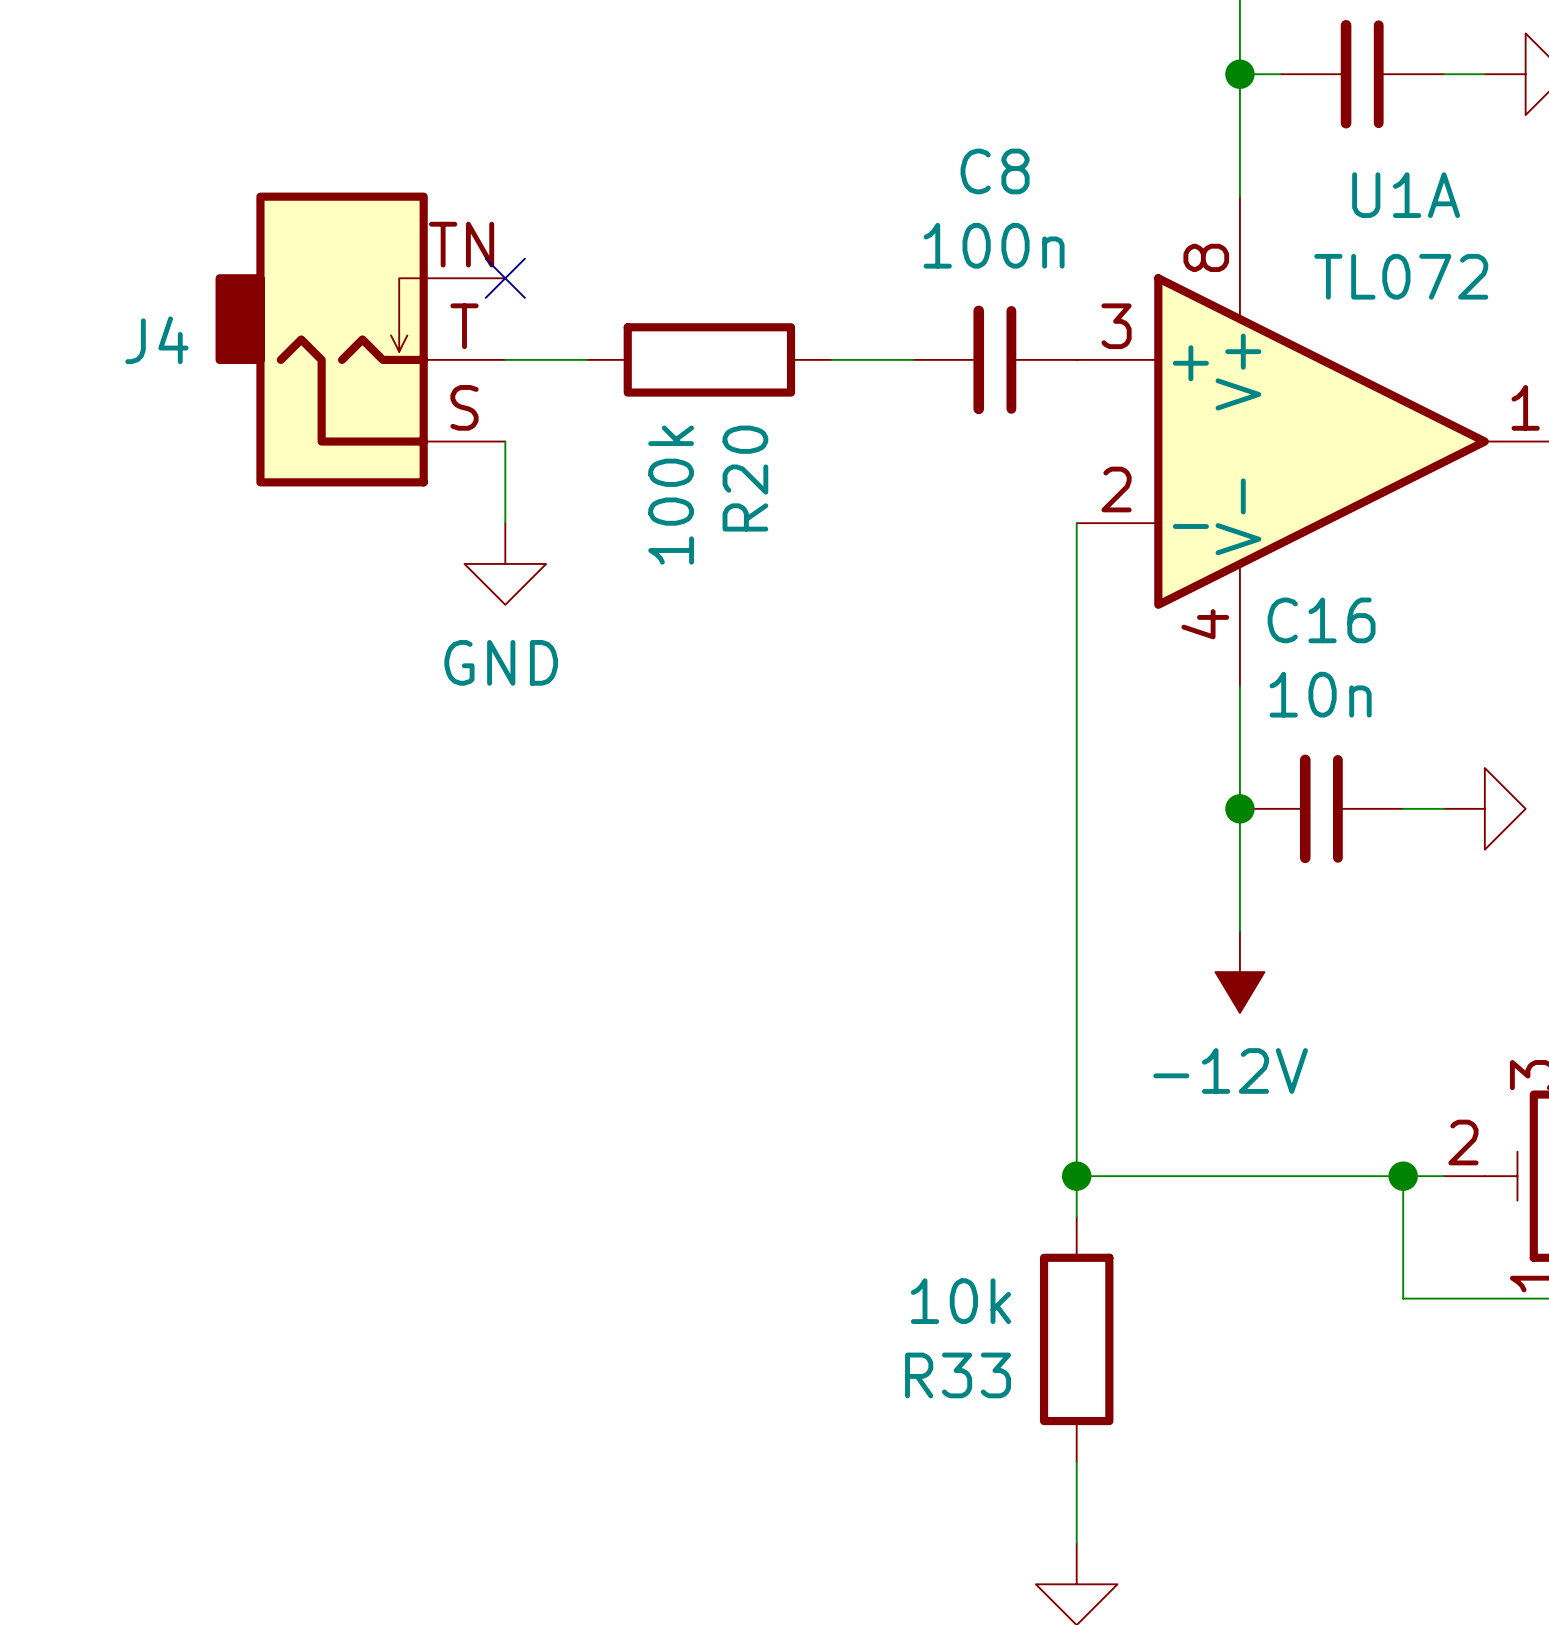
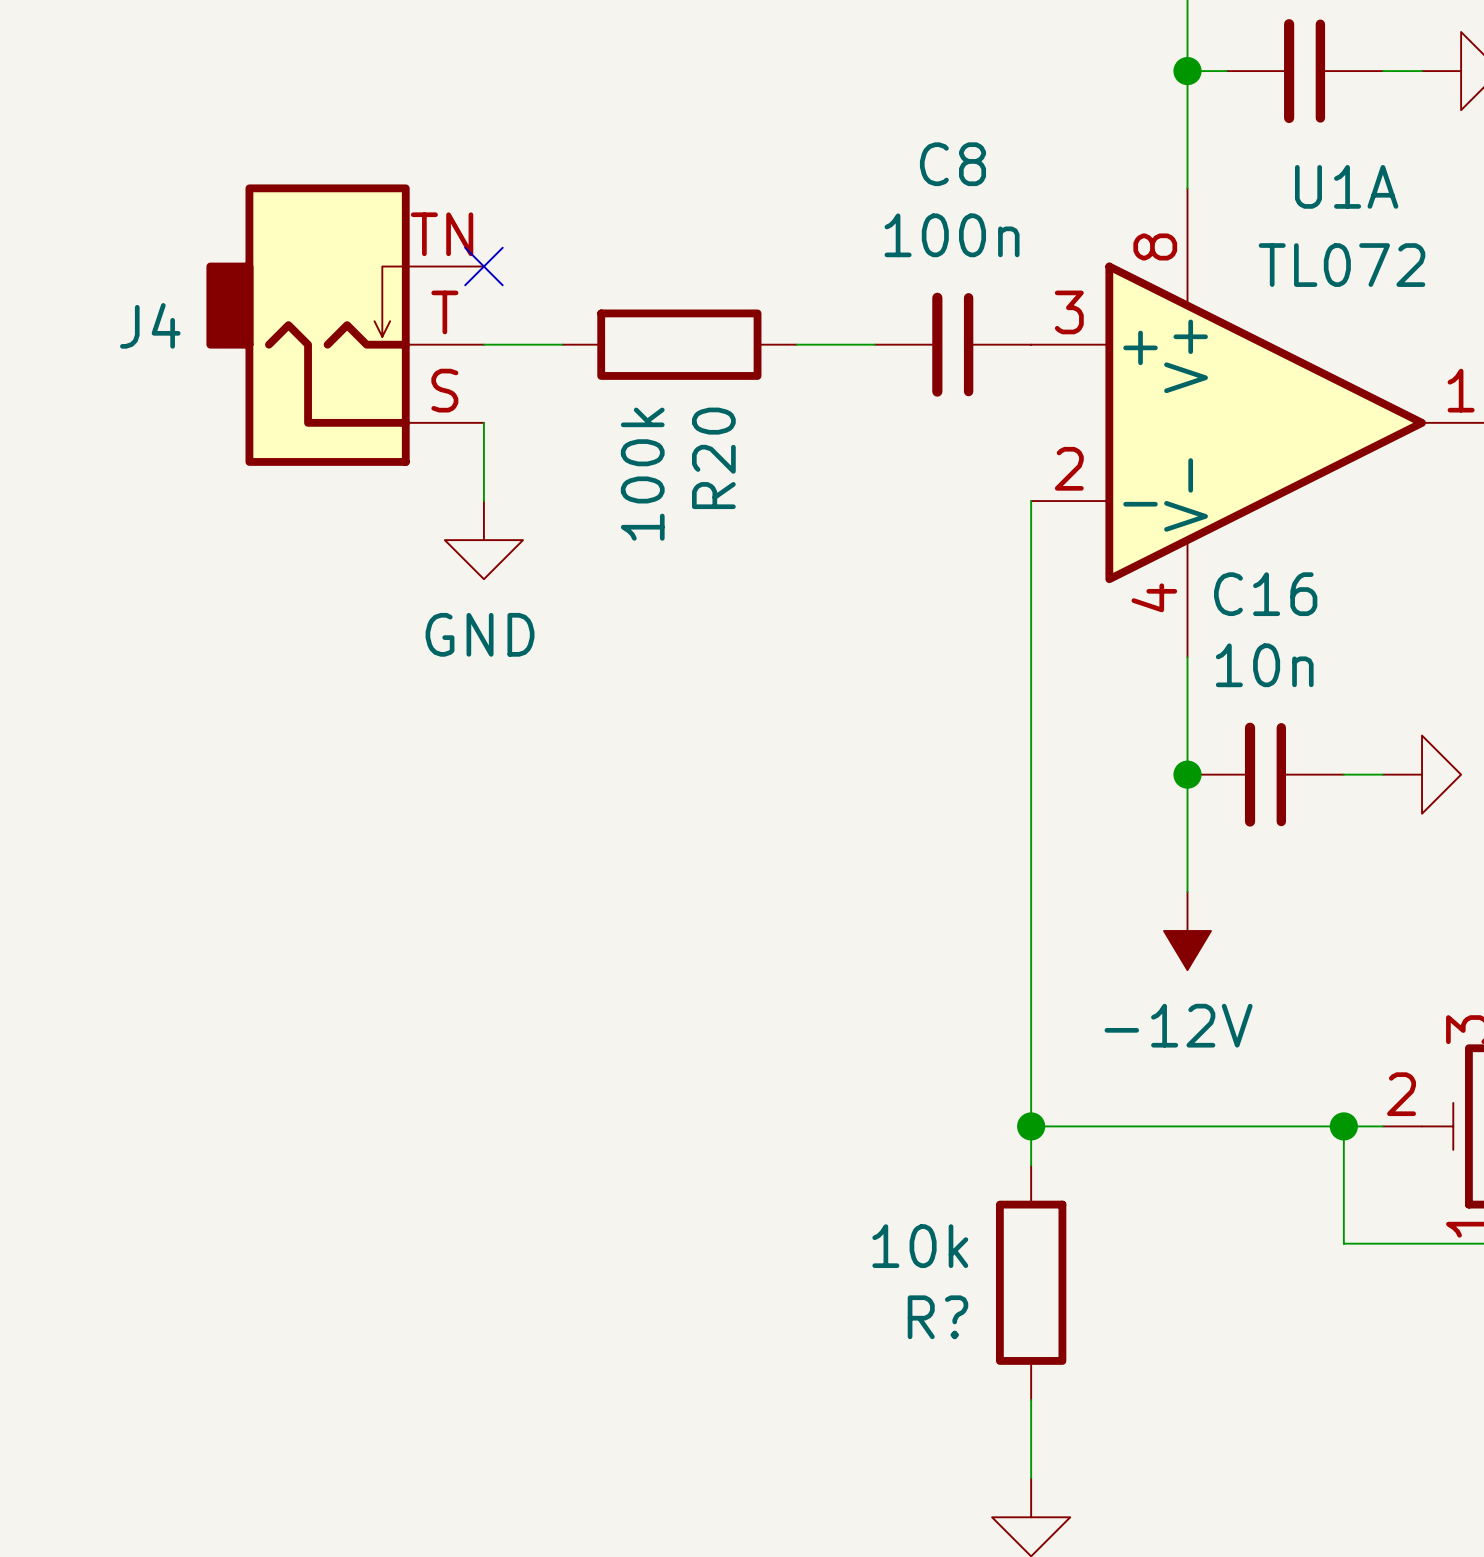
R33 name: R33 (958, 1375) -> R? (937, 1317)

